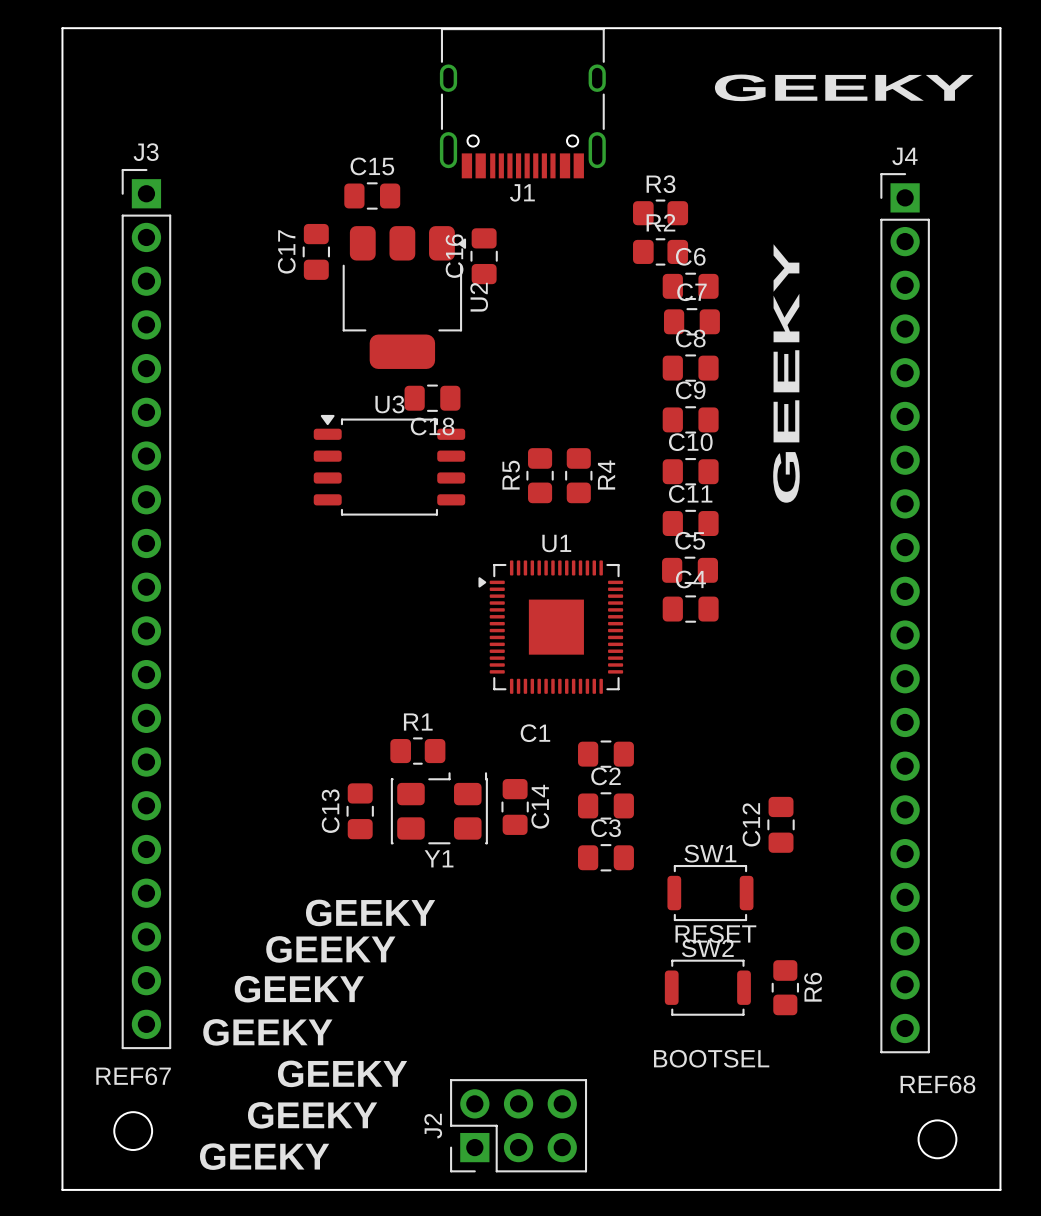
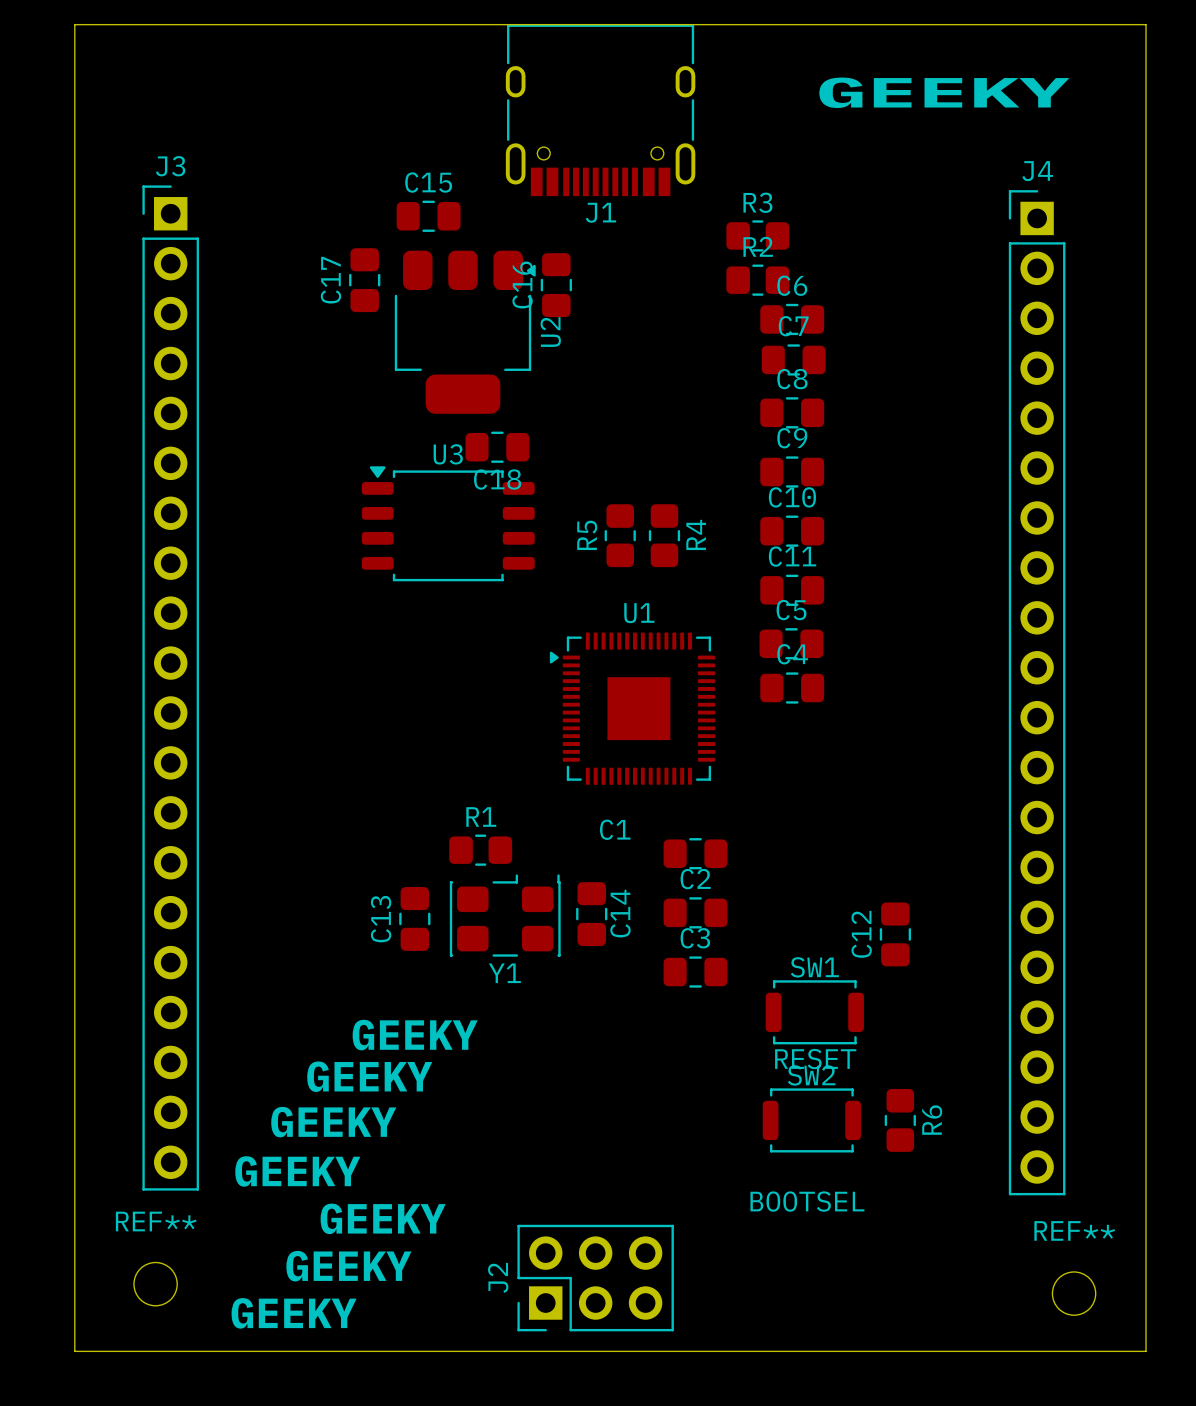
text: GEEKY (786, 373) -> none
REF67 name: REF67 (133, 1076) -> REF** (156, 1221)
REF68 name: REF68 (937, 1084) -> REF** (1074, 1230)

